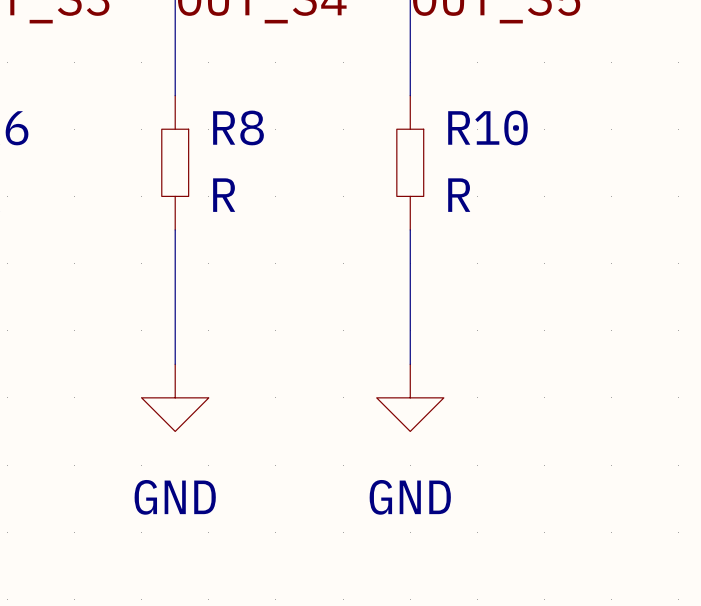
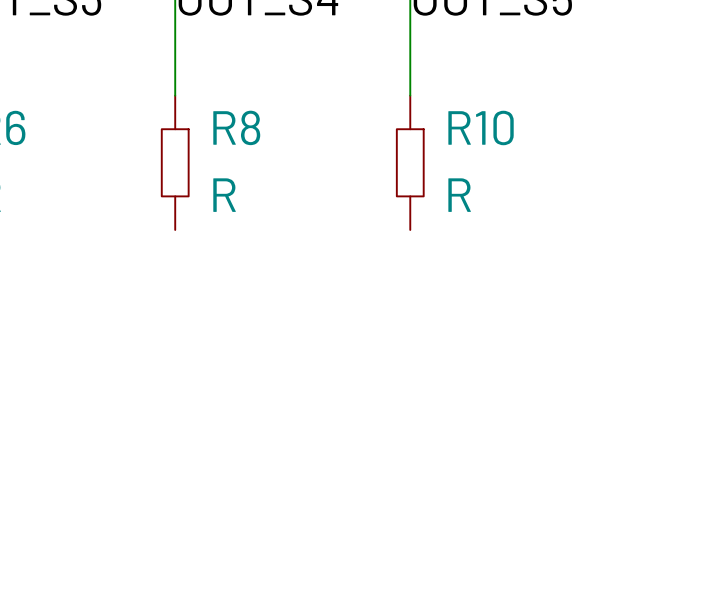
wire: (175, 229) (175, 364) -> none
wire: (410, 229) (410, 364) -> none
power symbol: GND (175, 397) -> none
power symbol: GND (410, 397) -> none

